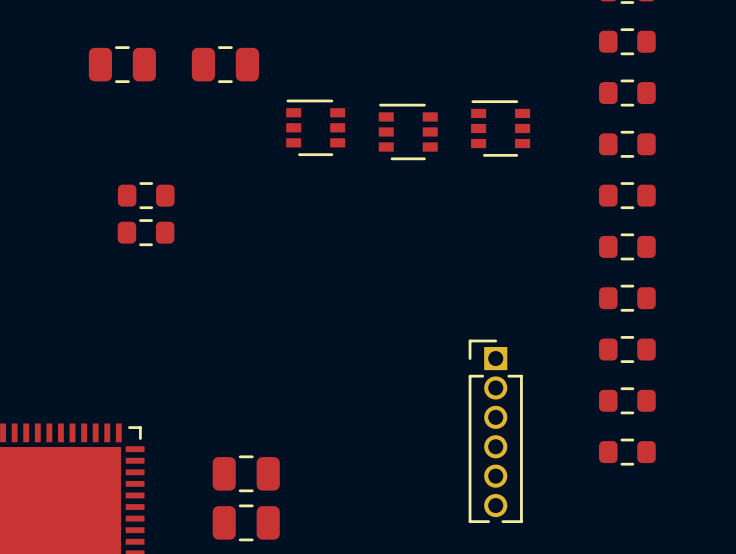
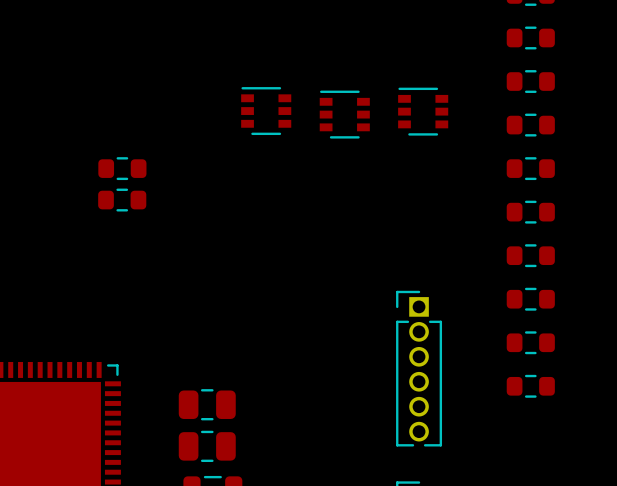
part: (122, 64) -> none
part: (225, 64) -> none

